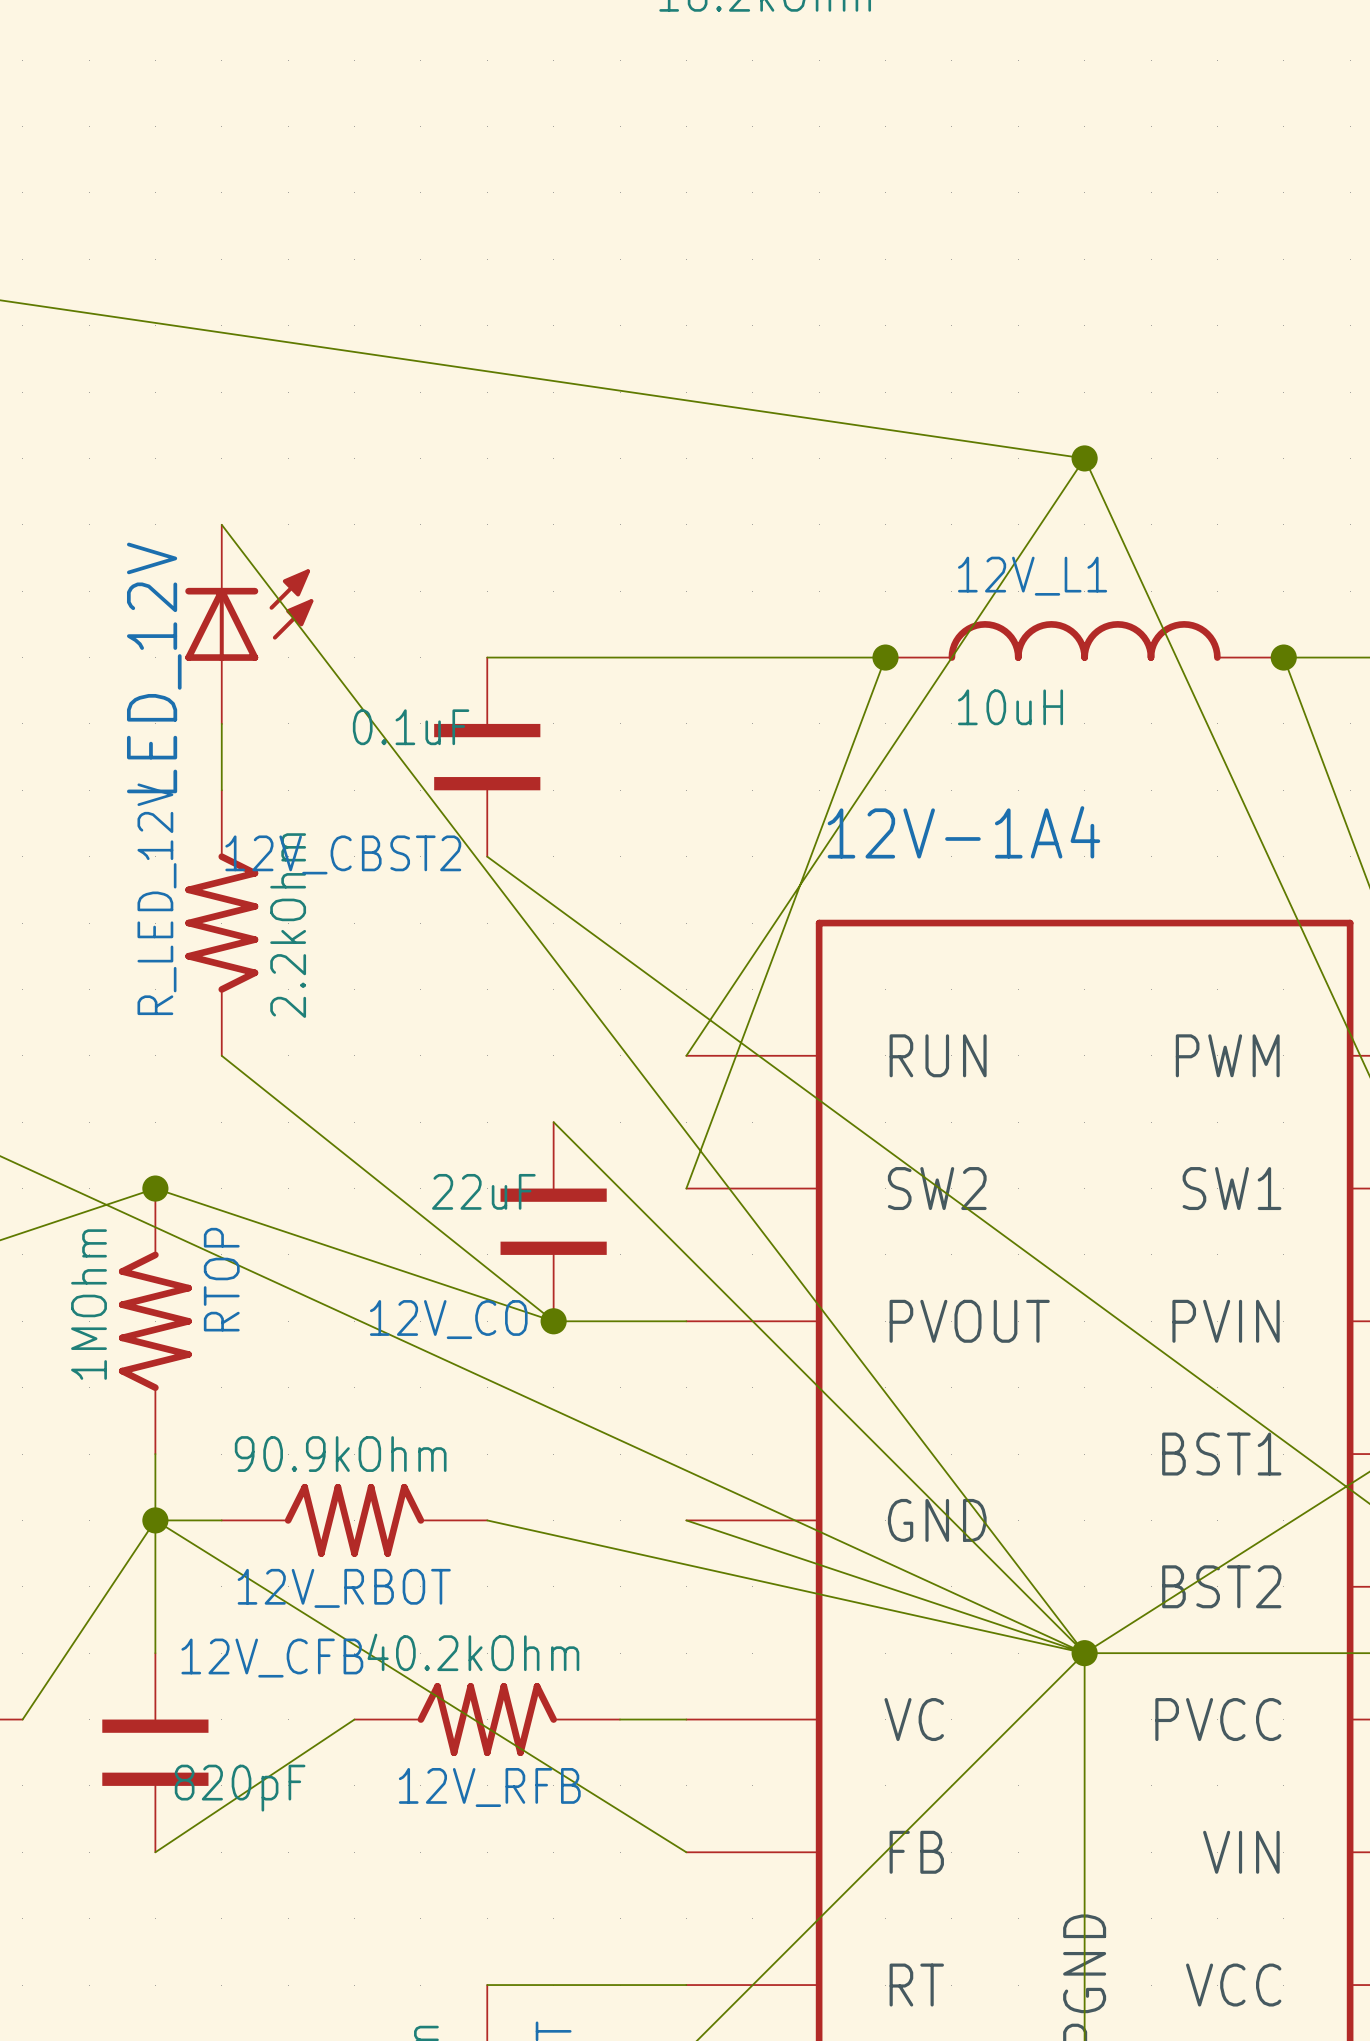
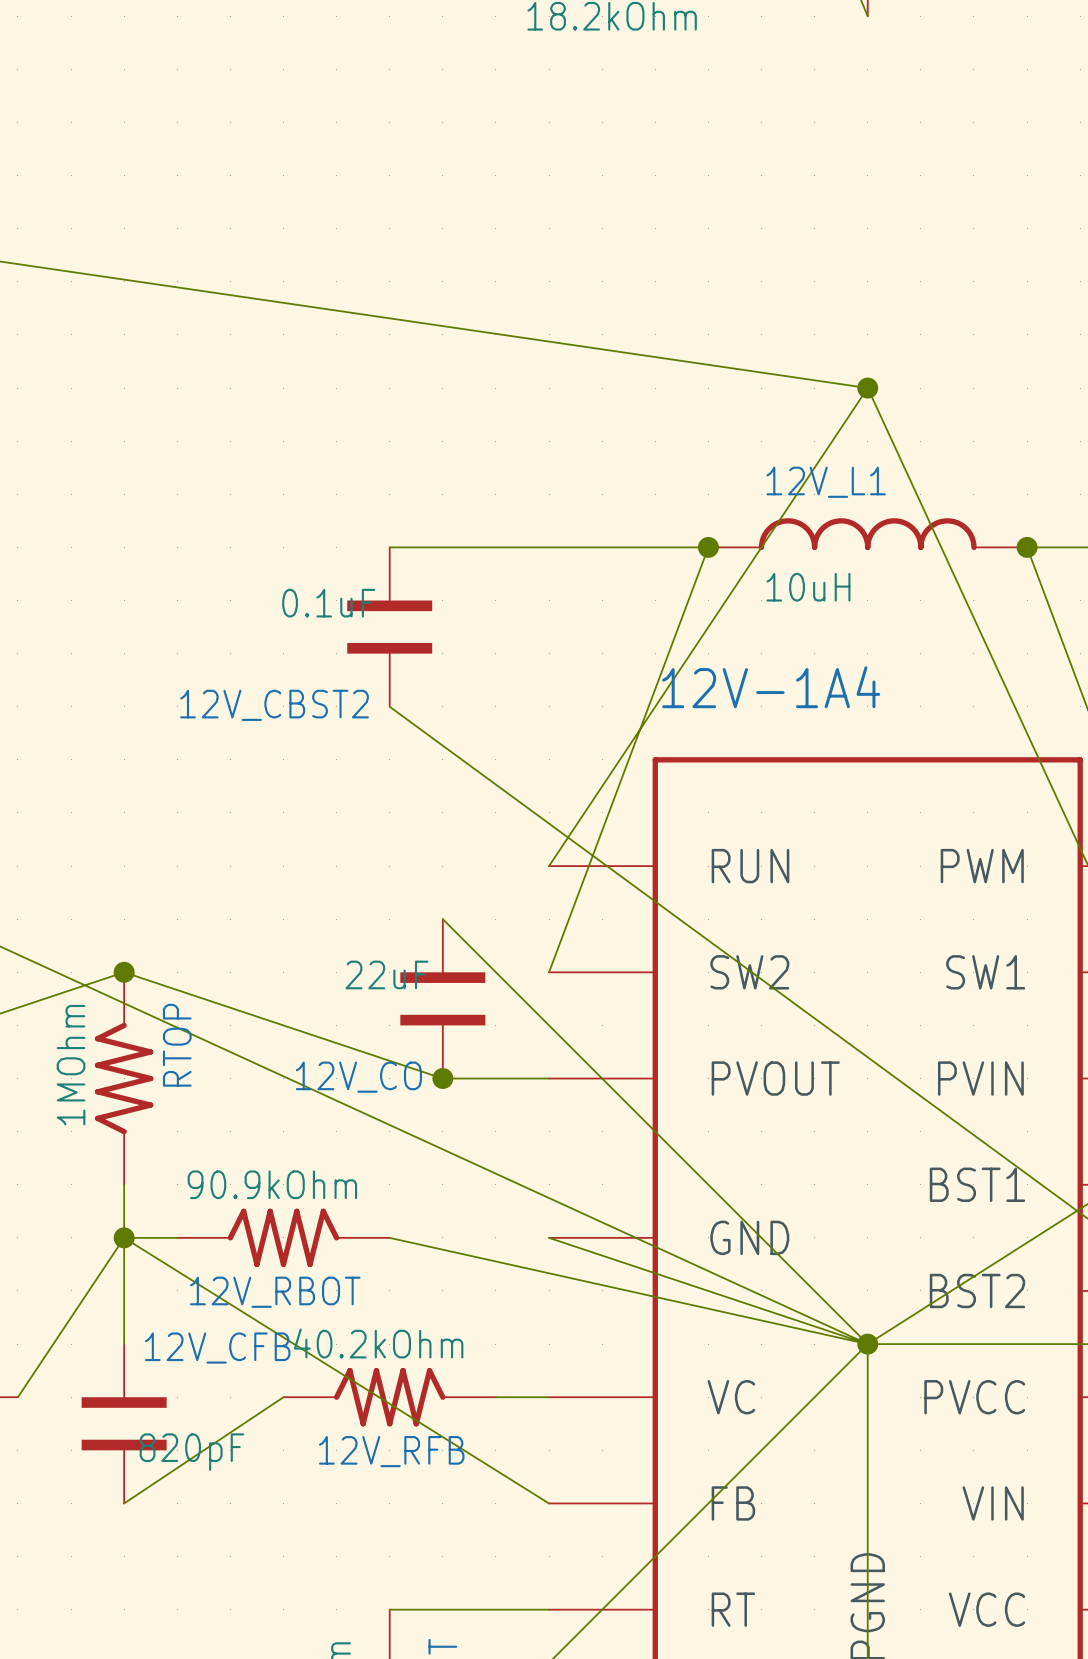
wire: (221, 524) (1084, 1653) -> none
LED_12V: (249, 624) -> none
wire: (221, 723) (221, 790) -> none
R_LED_12V: 2.2kOhm (221, 923) -> none
wire: (221, 1055) (553, 1321) -> none

